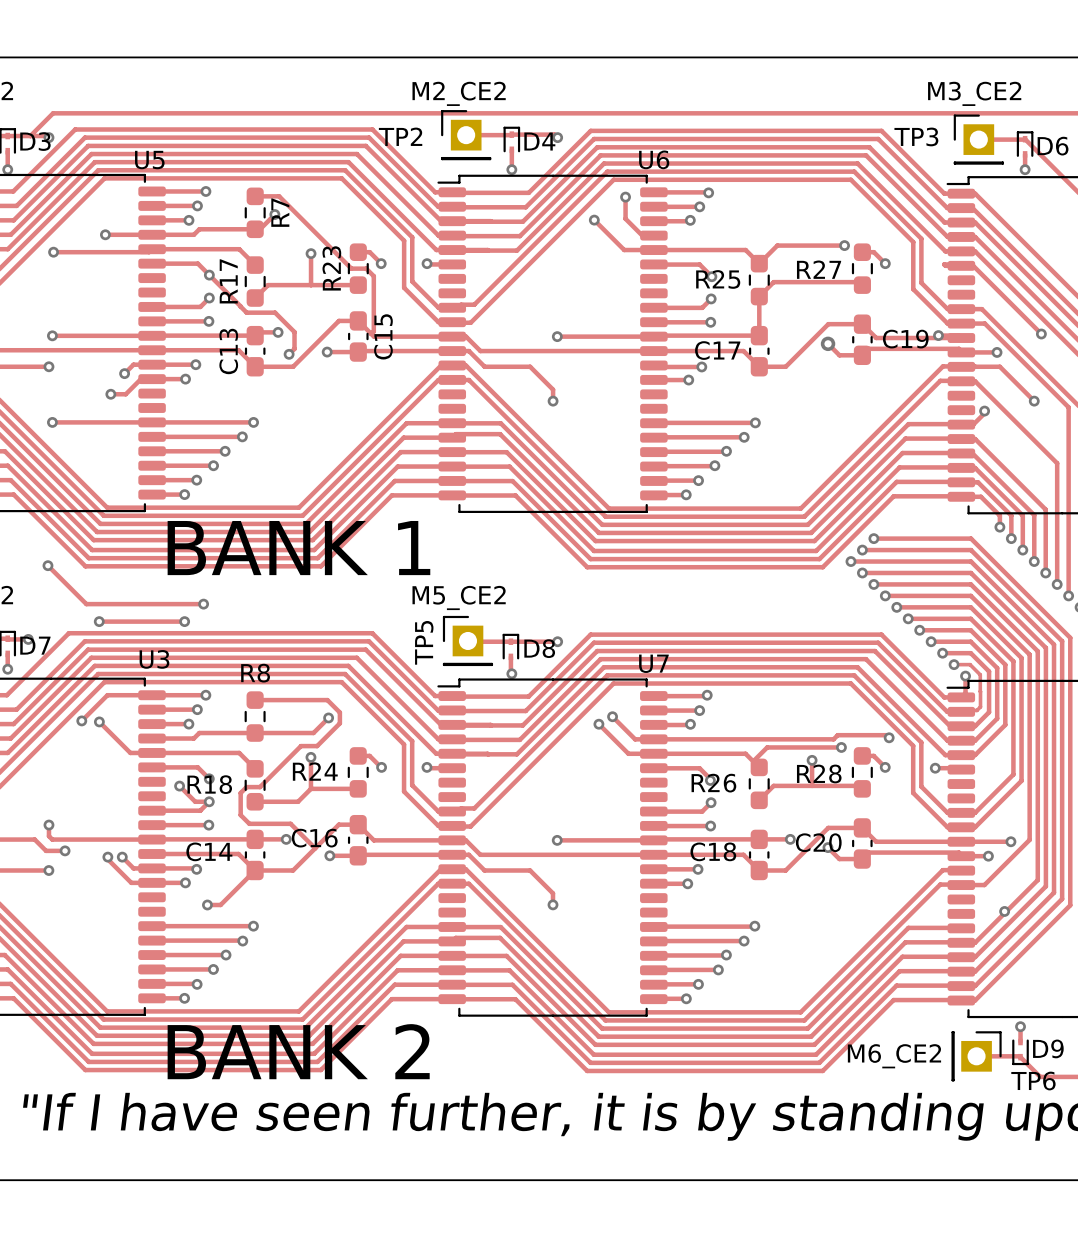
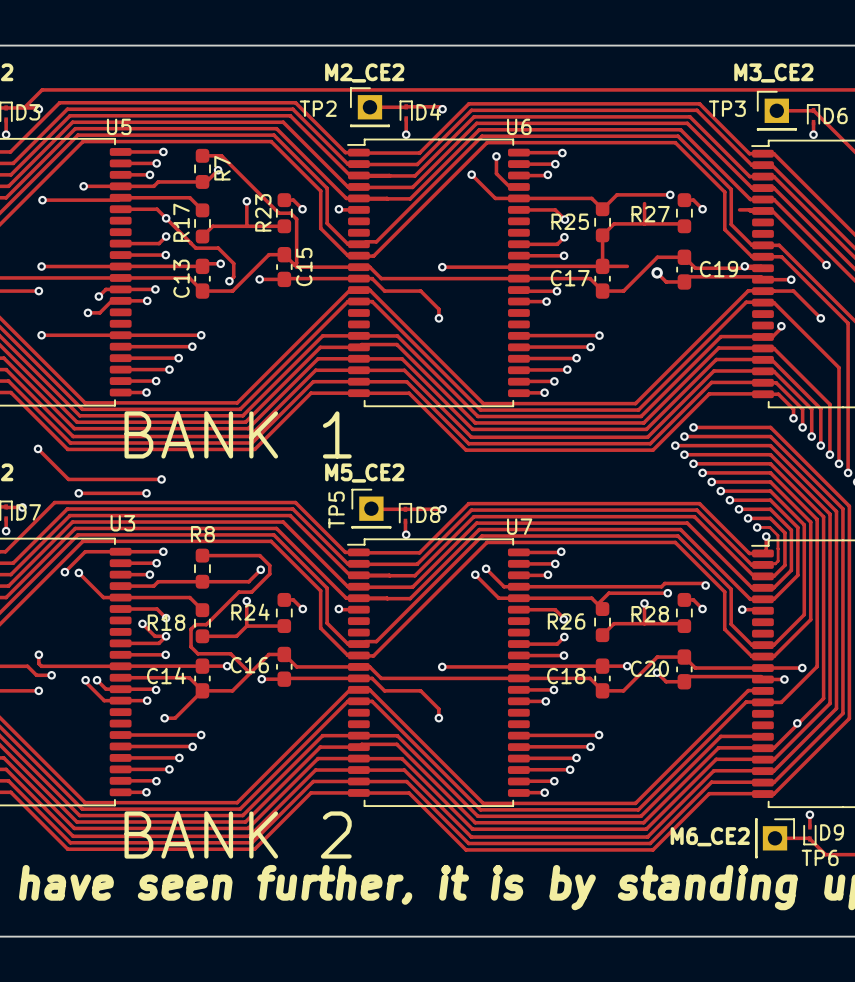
track: none -> (644, 203) (644, 223)
track: none -> (739, 209) (749, 209)
track: none -> (606, 266) (627, 266)

